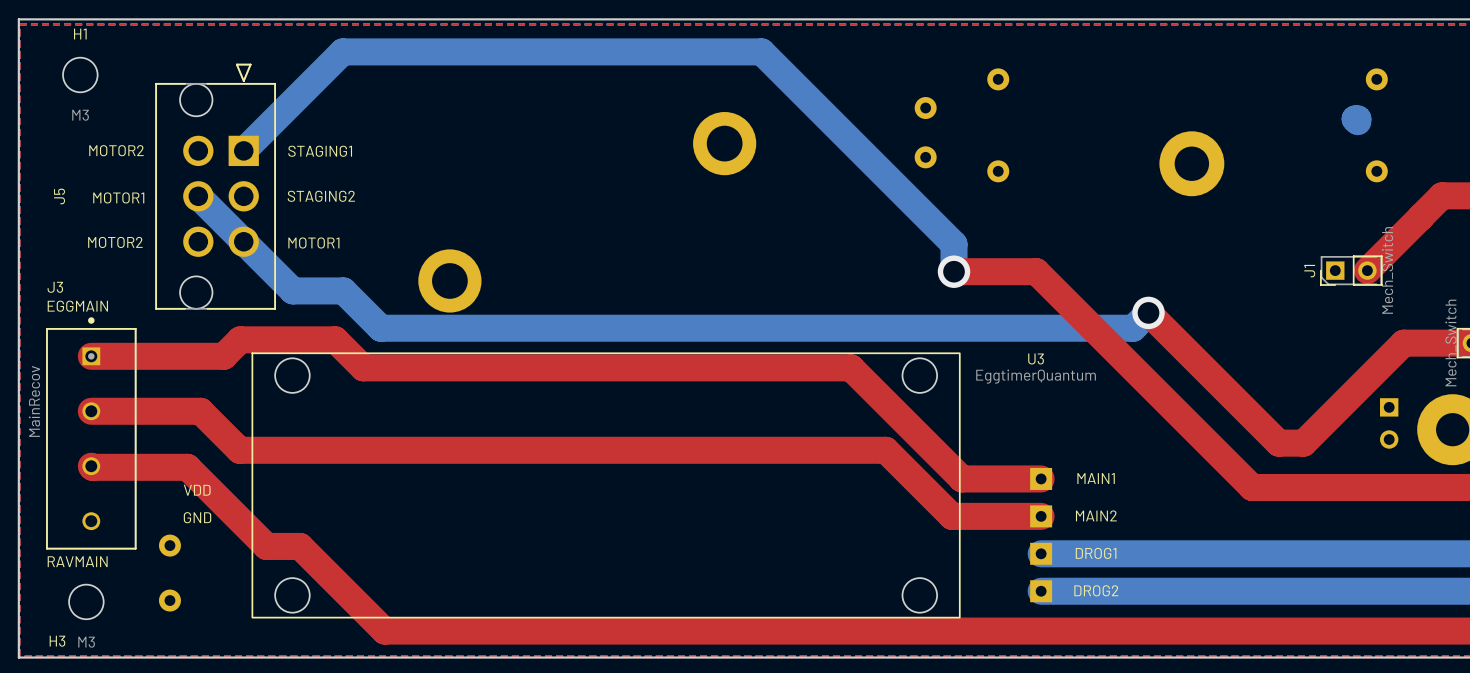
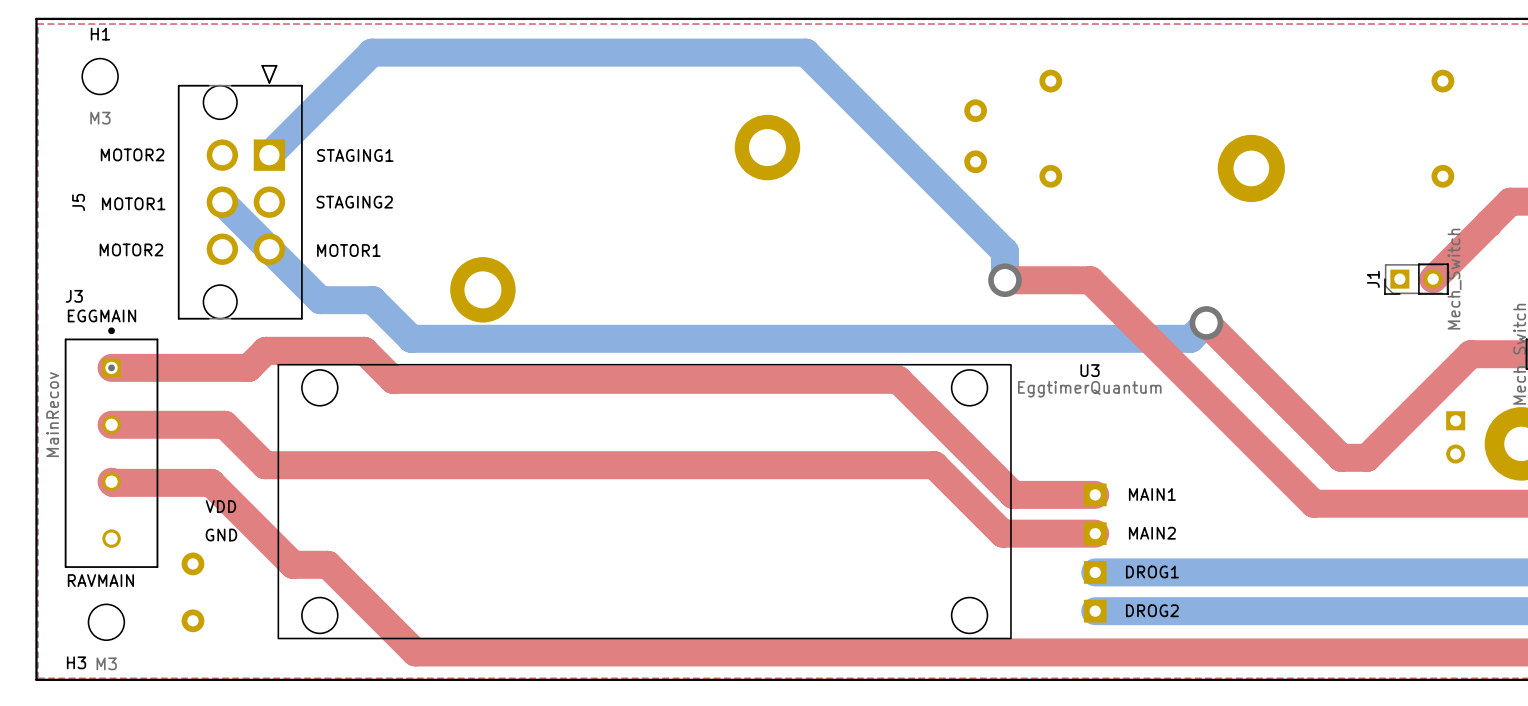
bottom track: (1356, 120) (1355, 118) (1357, 118) (1357, 121) -> none

